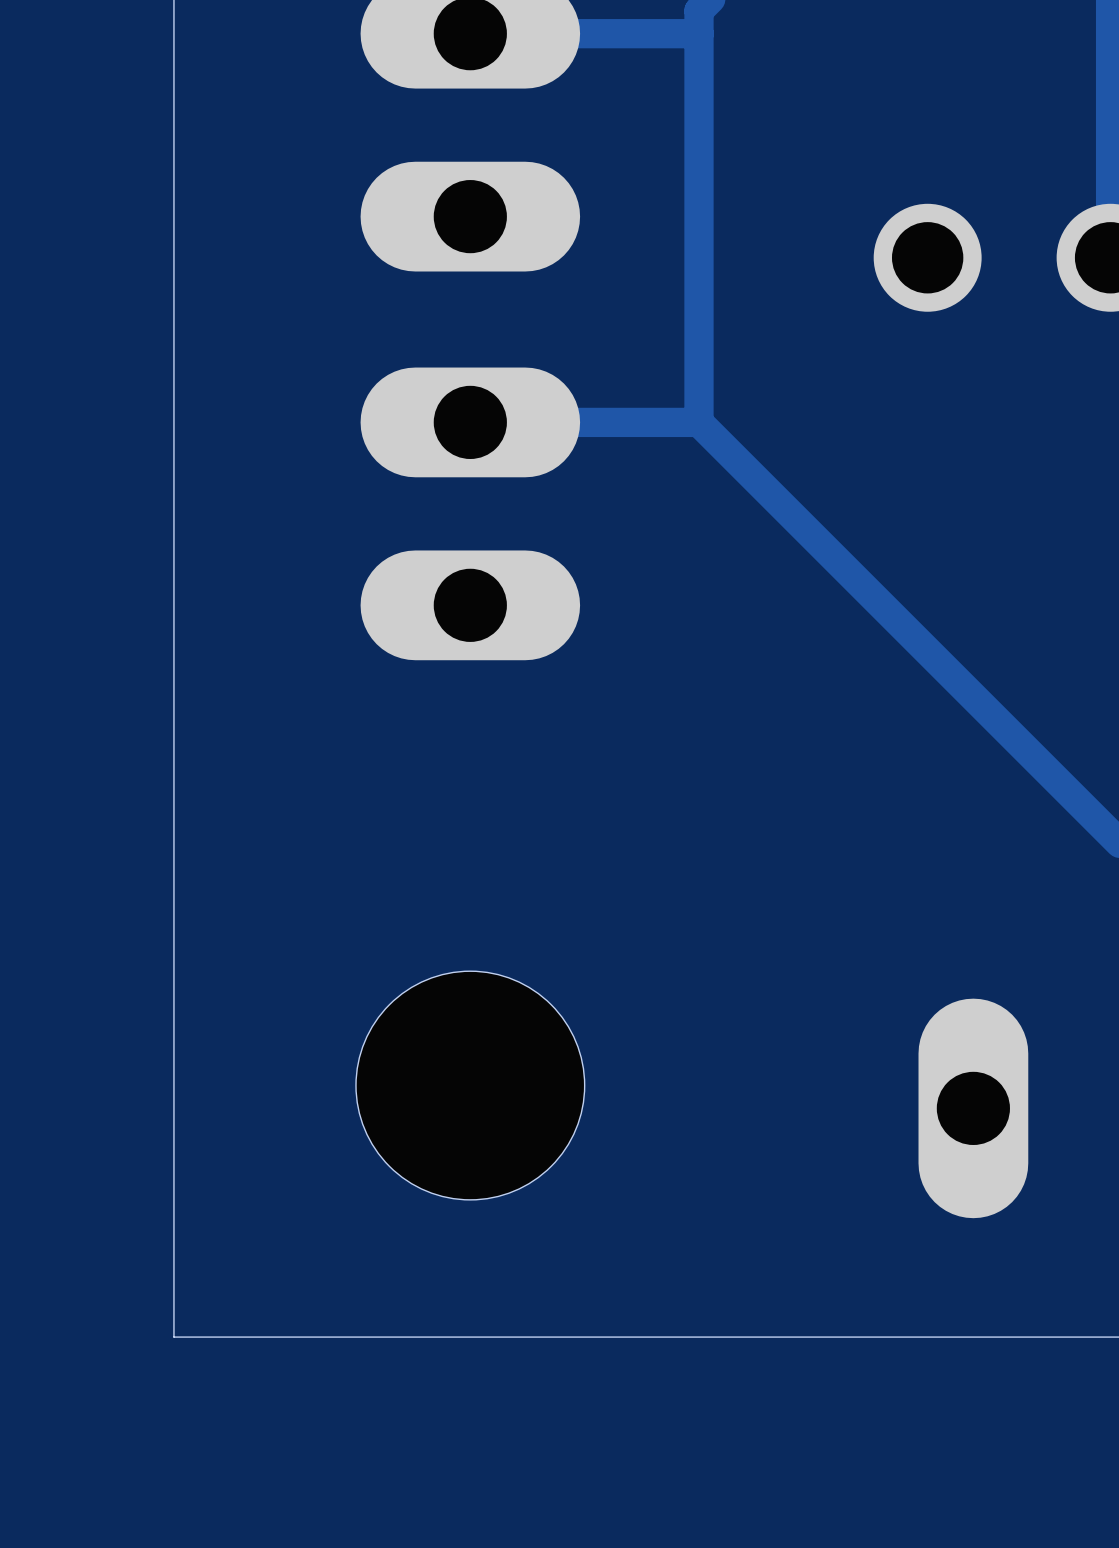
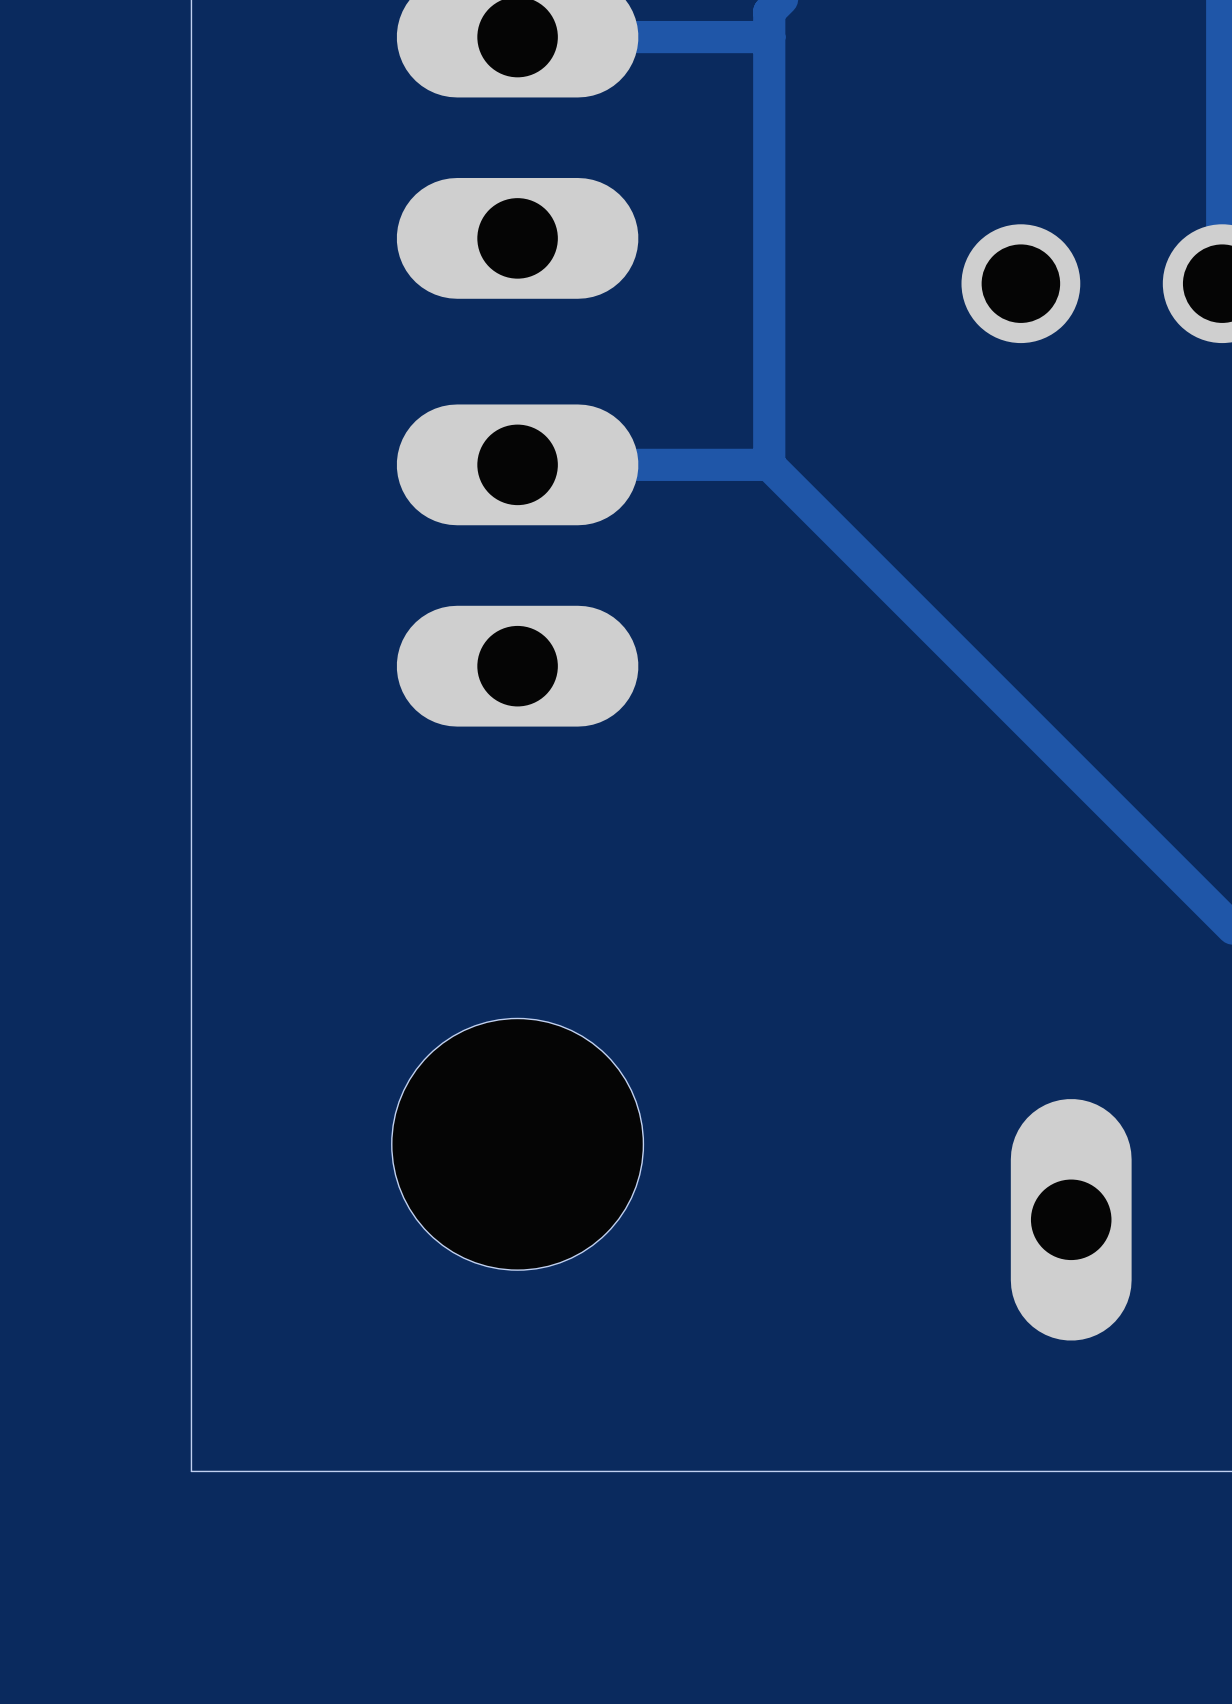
hole position: (470, 1085) -> (517, 1144)

